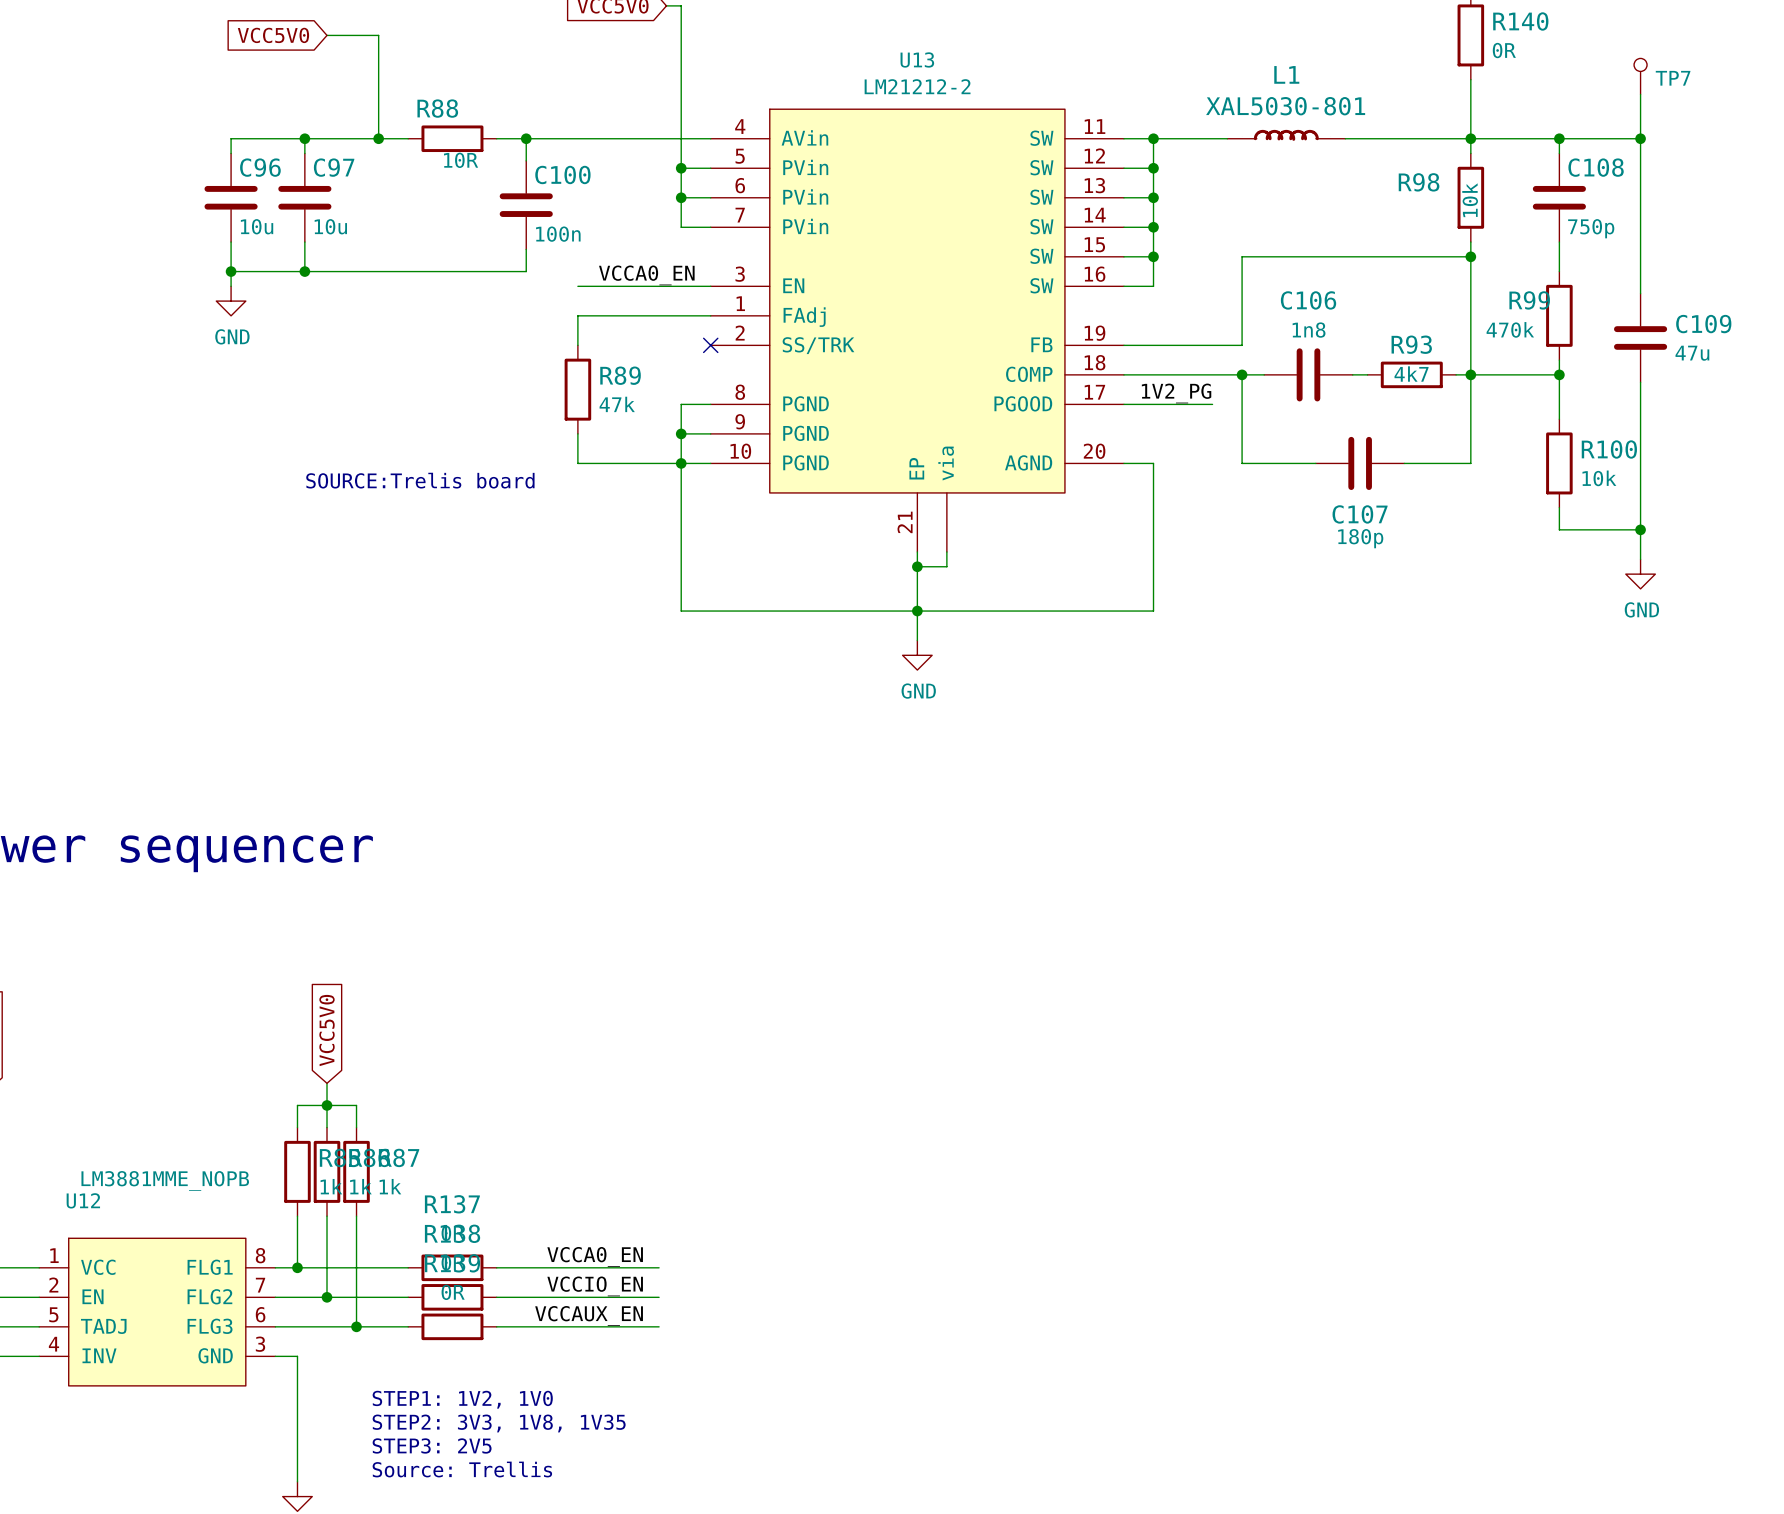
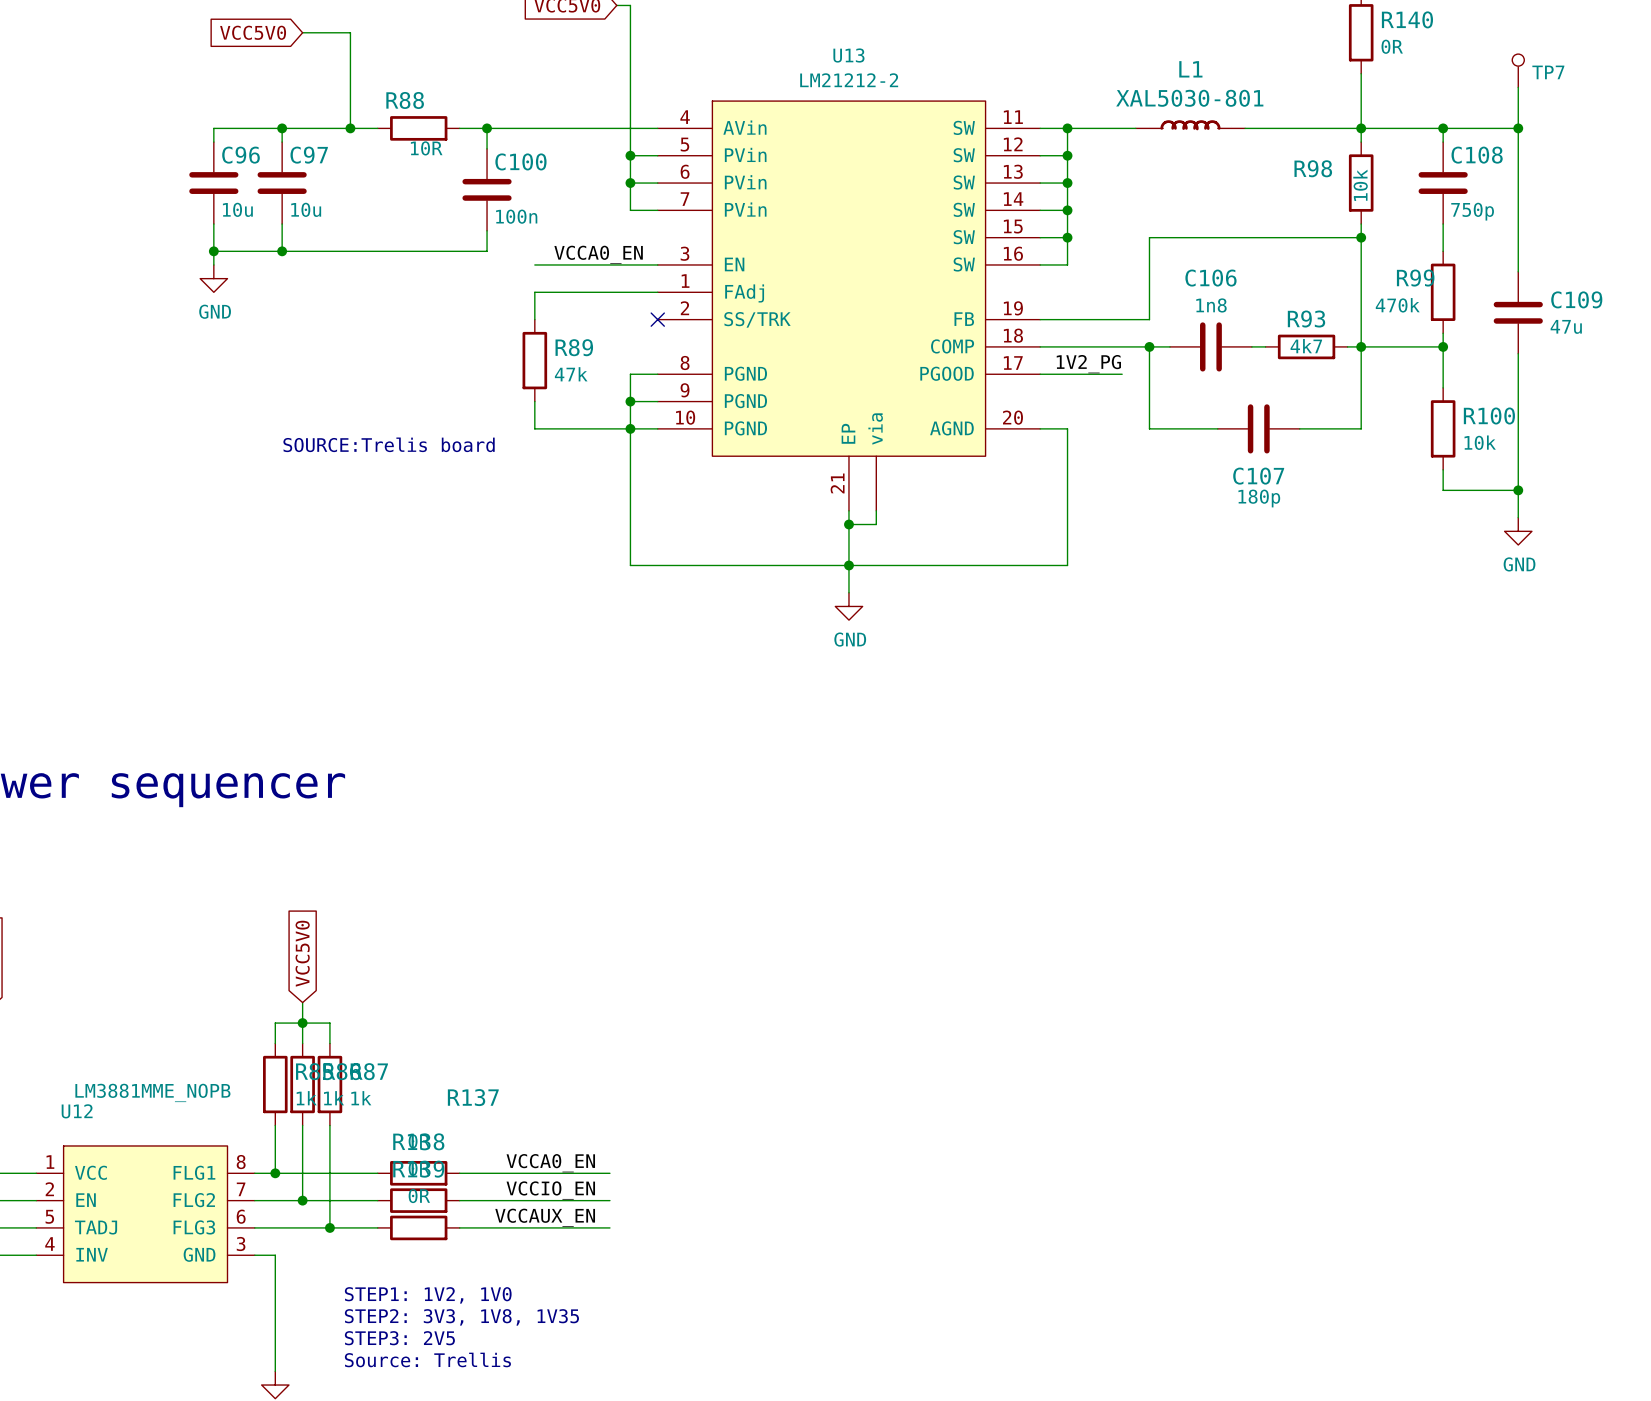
R137 name position: R137 (452, 1204) -> R137 (473, 1097)

